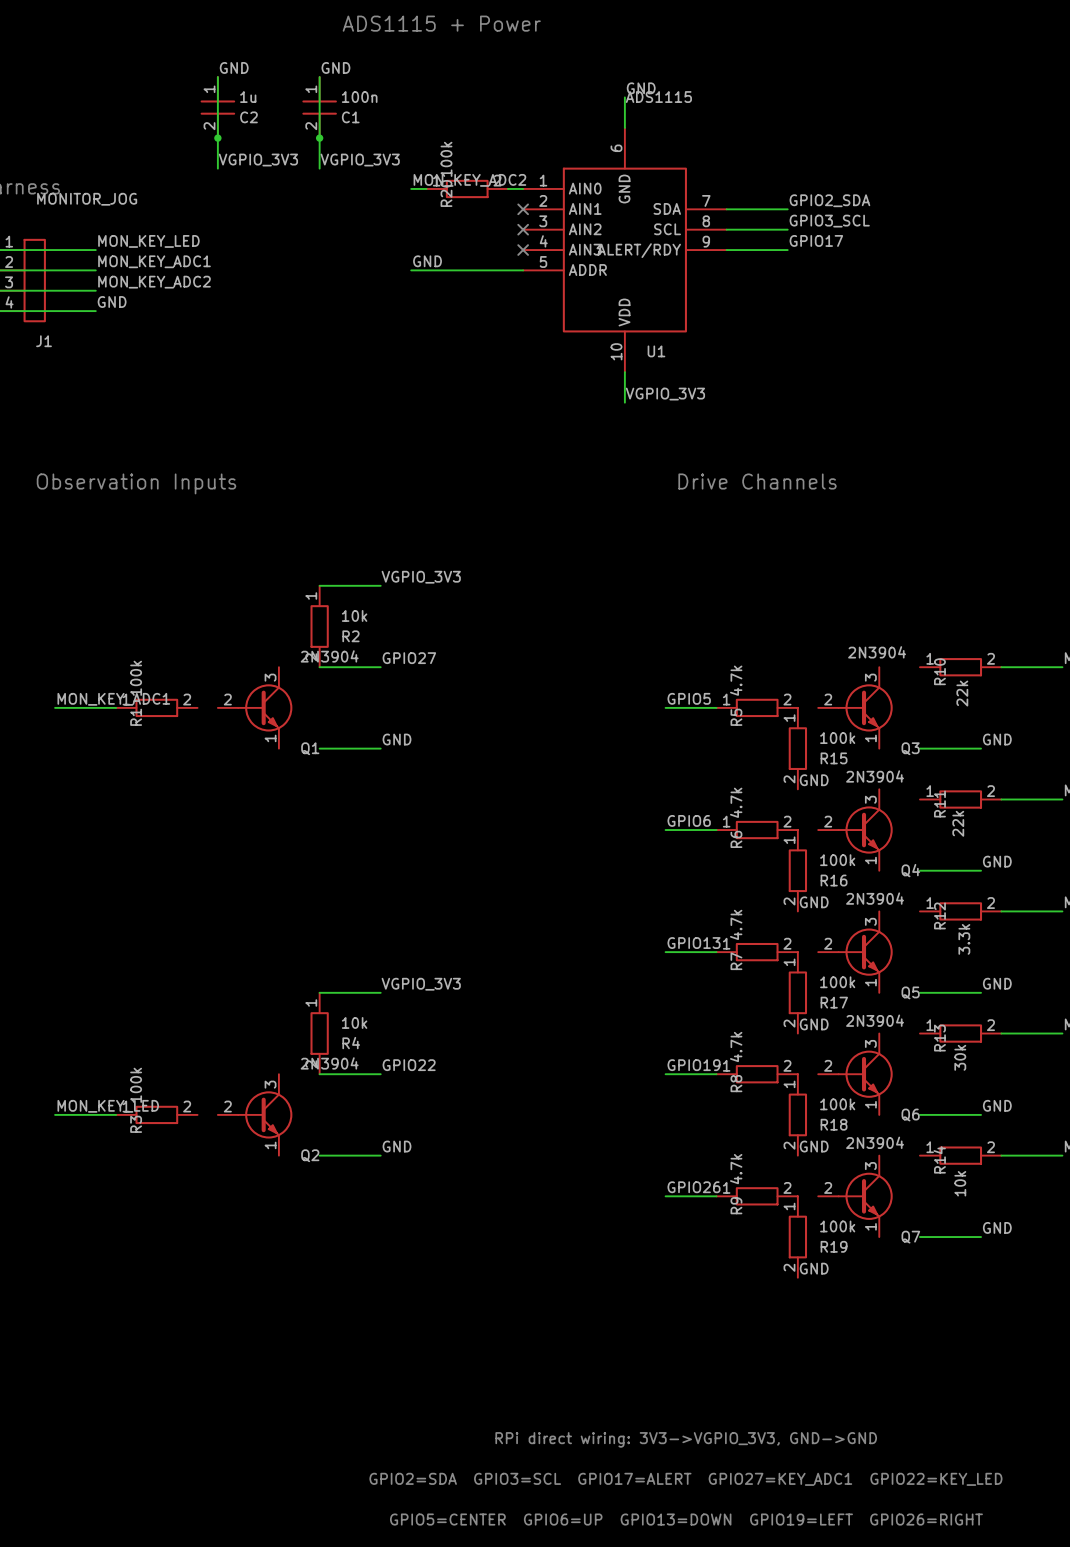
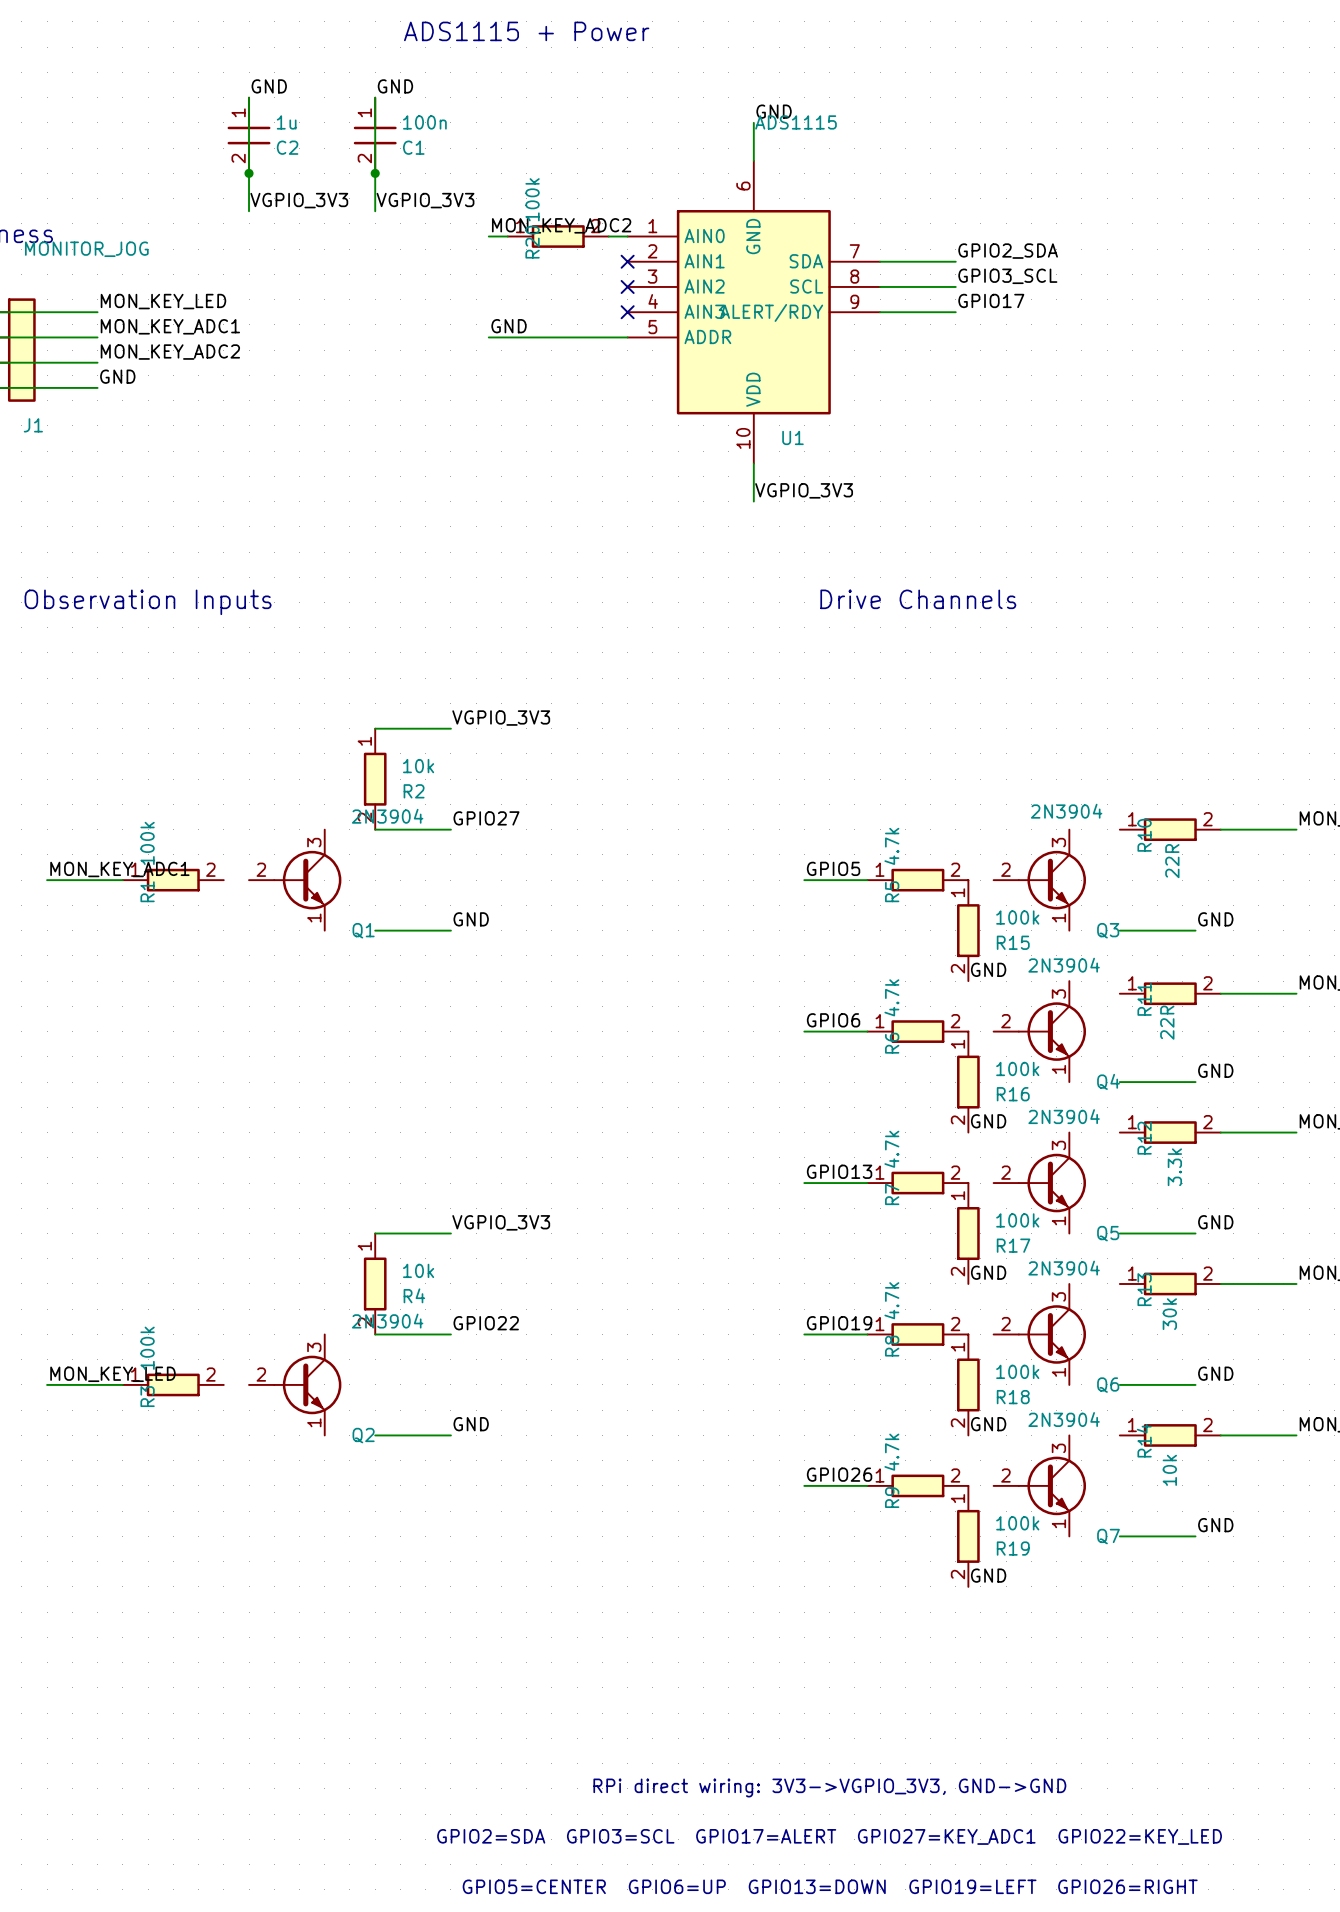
R10 value: 22k (962, 693) -> 22R (1172, 861)
R11 value: 22k (958, 823) -> 22R (1167, 1022)

